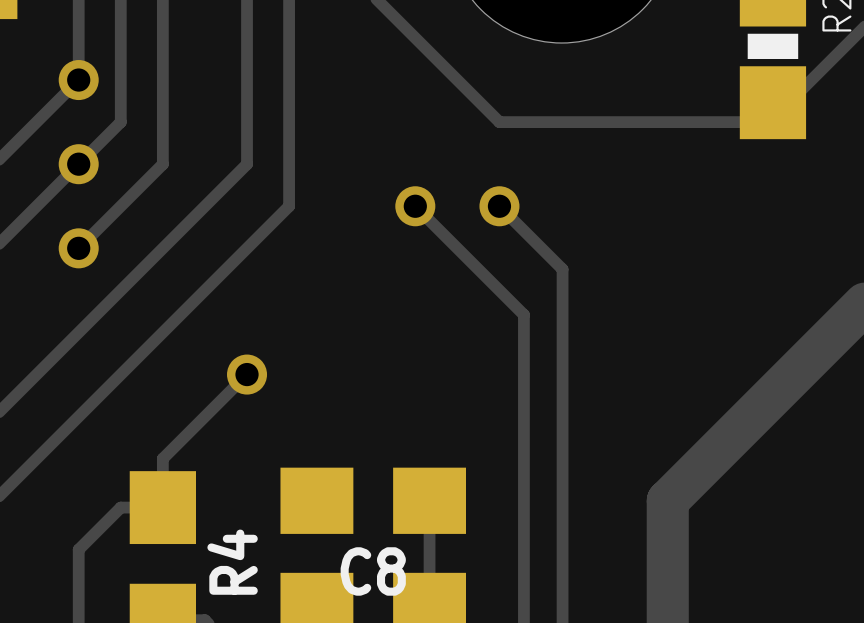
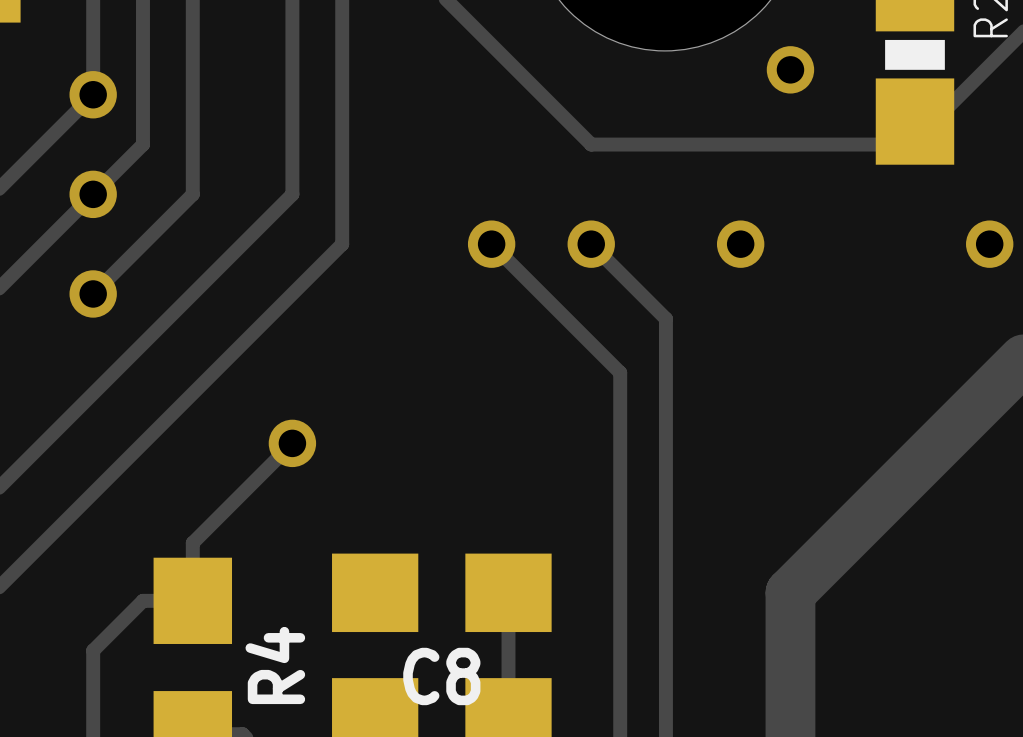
via: none -> (790, 69)
via: none -> (740, 244)
via: none -> (989, 244)

